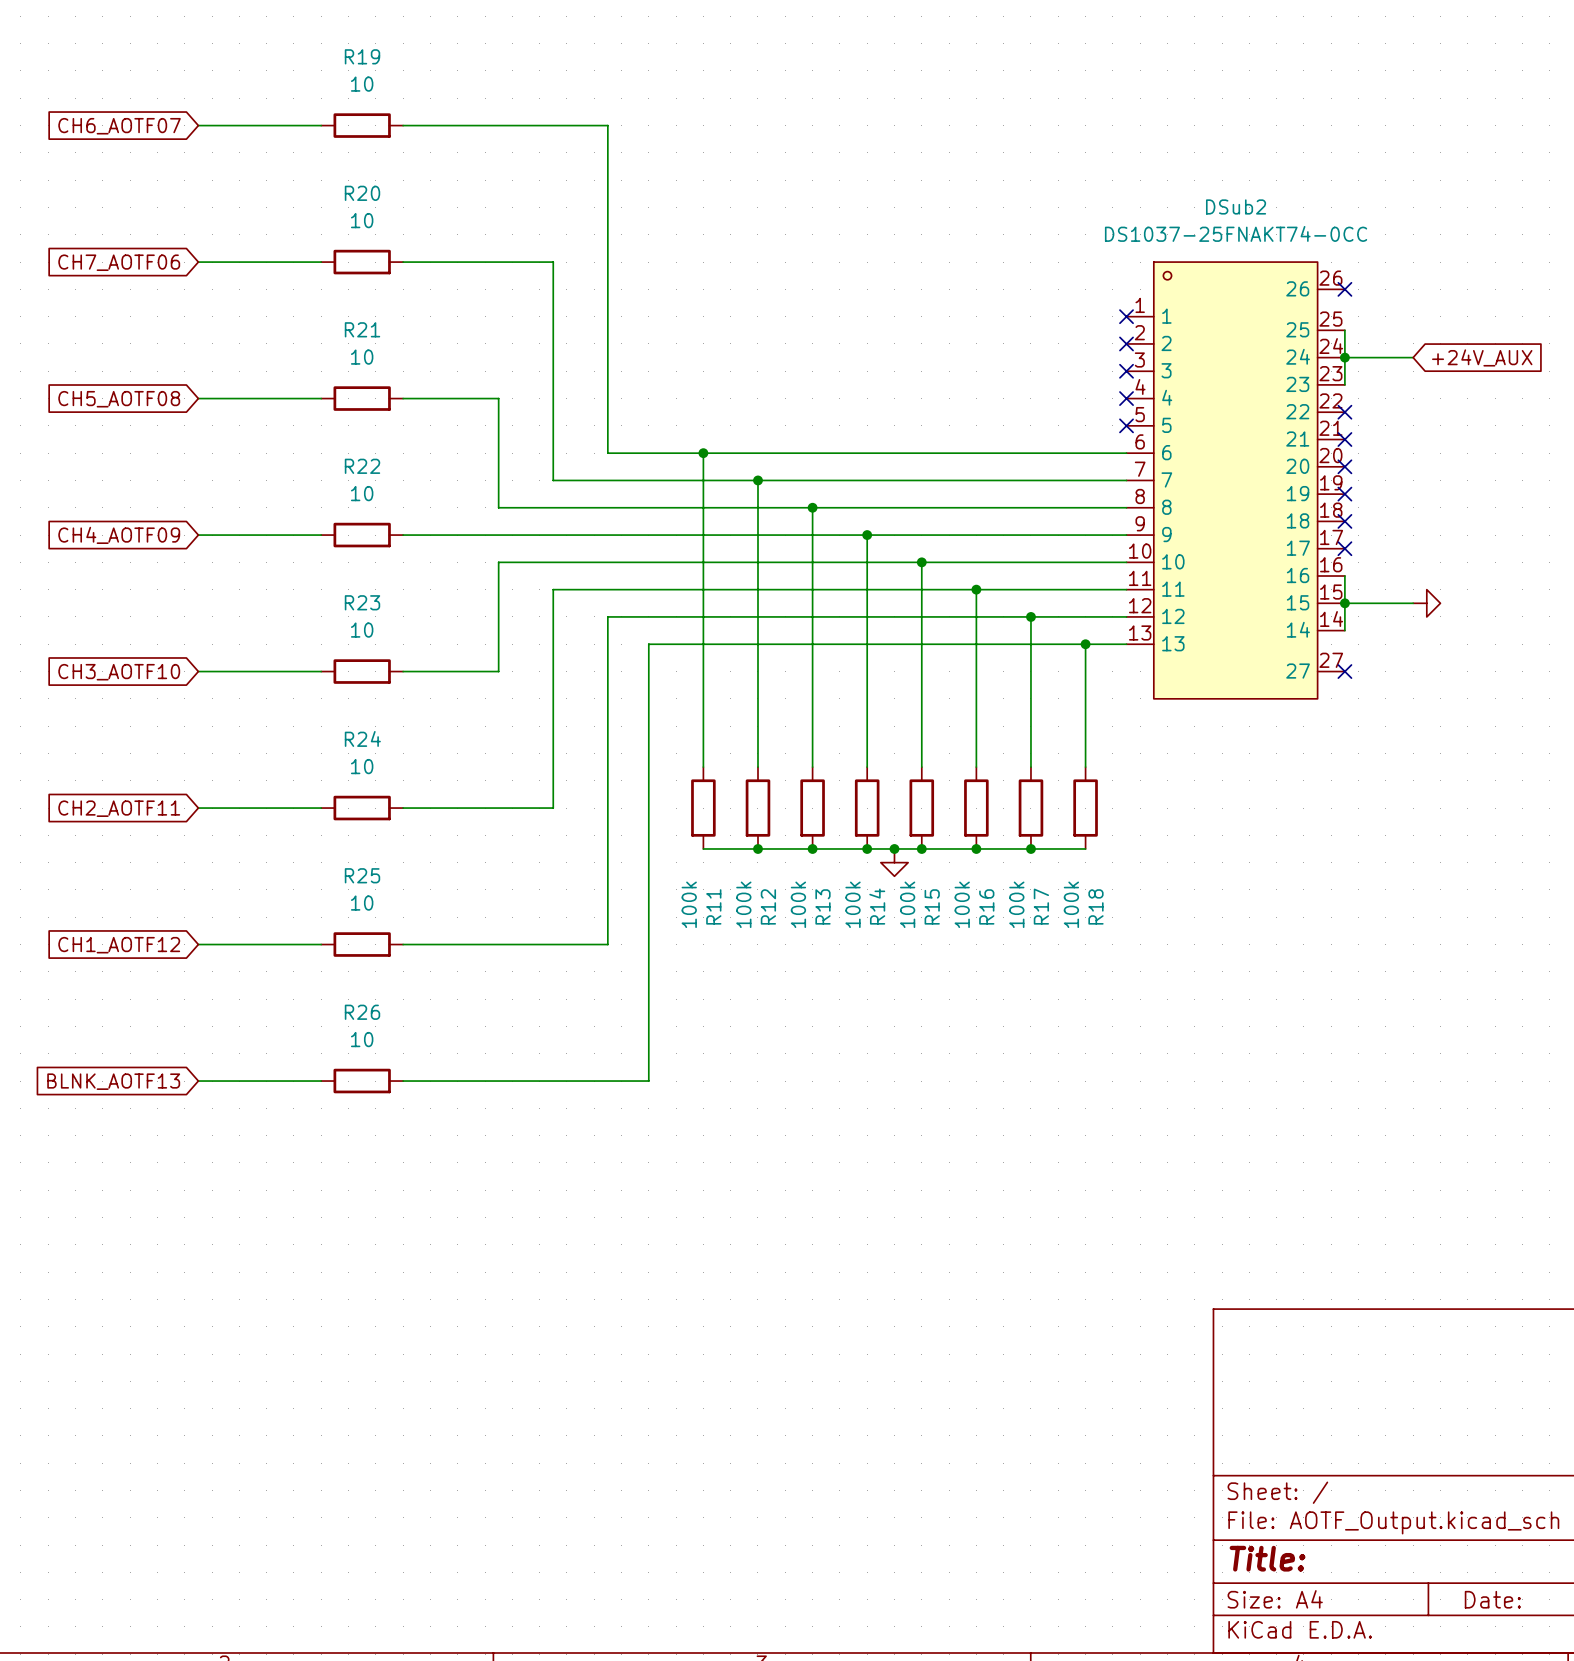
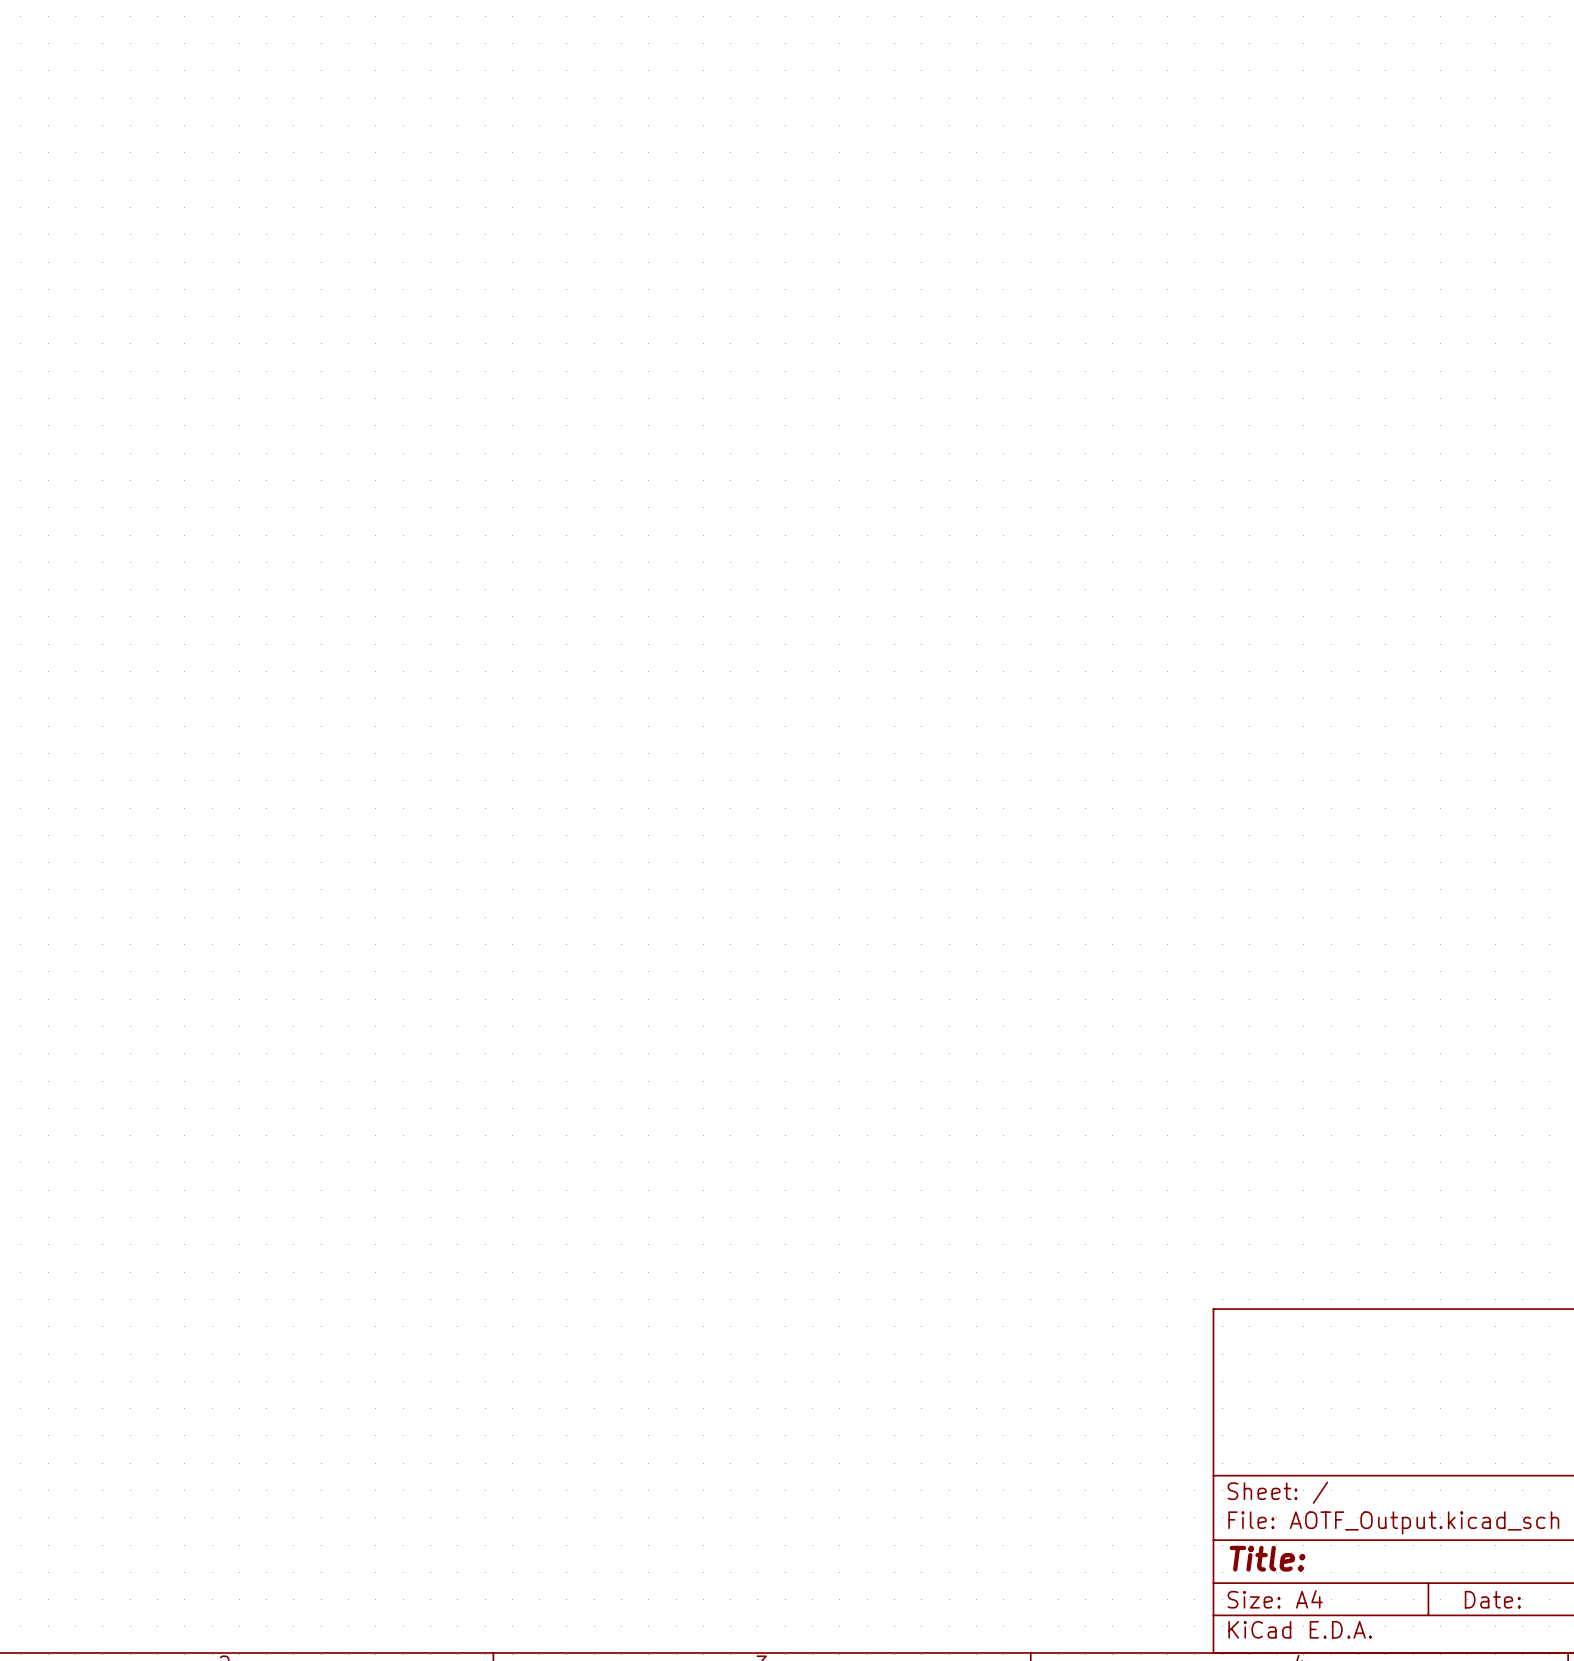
wire: (198, 125) (321, 125) -> none
R19: 10 (362, 125) -> none
wire: (403, 125) (607, 125) (607, 453) (1126, 453) -> none
global label: CH6_AOTF07 (119, 126) -> none
global label: CH7_AOTF06 (119, 262) -> none
wire: (198, 262) (321, 262) -> none
R20: 10 (362, 262) -> none
wire: (403, 262) (553, 262) (553, 480) (1126, 480) -> none
no-connect mark: (1344, 289) -> none
no-connect mark: (1126, 316) -> none
wire: (1344, 330) (1344, 384) -> none
no-connect mark: (1126, 343) -> none
wire: (1344, 357) (1413, 357) -> none
junction: (1344, 357) -> none
global label: +24V_AUX (1482, 357) -> none
no-connect mark: (1126, 371) -> none
wire: (198, 398) (321, 398) -> none
R21: 10 (362, 398) -> none
wire: (403, 398) (498, 398) (498, 507) (1126, 507) -> none
no-connect mark: (1126, 398) -> none
global label: CH5_AOTF08 (119, 399) -> none
no-connect mark: (1344, 412) -> none
no-connect mark: (1126, 425) -> none
no-connect mark: (1344, 439) -> none
wire: (703, 453) (703, 767) -> none
junction: (703, 453) -> none
no-connect mark: (1344, 466) -> none
wire: (757, 480) (757, 767) -> none
junction: (757, 480) -> none
DSub2: DS1037-25FNAKT74-0CC (1235, 480) -> none
no-connect mark: (1344, 494) -> none
wire: (812, 507) (812, 767) -> none
junction: (812, 507) -> none
no-connect mark: (1344, 521) -> none
global label: CH4_AOTF09 (119, 535) -> none
wire: (198, 535) (321, 535) -> none
R22: 10 (362, 535) -> none
wire: (403, 535) (1126, 535) -> none
wire: (867, 535) (867, 767) -> none
junction: (867, 535) -> none
no-connect mark: (1344, 548) -> none
wire: (921, 562) (921, 767) -> none
junction: (921, 562) -> none
wire: (1126, 562) (498, 562) (498, 671) (403, 671) -> none
wire: (1344, 576) (1344, 630) -> none
wire: (976, 589) (976, 767) -> none
junction: (976, 589) -> none
wire: (1126, 589) (553, 589) (553, 808) (403, 808) -> none
wire: (1344, 603) (1413, 603) -> none
junction: (1344, 603) -> none
power symbol: (1426, 603) -> none
wire: (1030, 616) (1030, 767) -> none
junction: (1030, 616) -> none
wire: (1126, 616) (607, 616) (607, 944) (403, 944) -> none
wire: (1085, 644) (1085, 767) -> none
junction: (1085, 644) -> none
wire: (1126, 644) (648, 644) (648, 1081) (403, 1081) -> none
wire: (198, 671) (321, 671) -> none
R23: 10 (362, 671) -> none
no-connect mark: (1344, 671) -> none
global label: CH3_AOTF10 (119, 672) -> none
global label: CH2_AOTF11 (119, 808) -> none
wire: (198, 808) (321, 808) -> none
R24: 10 (362, 808) -> none
R11: 100k (703, 808) -> none
R12: 100k (757, 808) -> none
R13: 100k (812, 808) -> none
R14: 100k (867, 808) -> none
R15: 100k (921, 808) -> none
R16: 100k (976, 808) -> none
R17: 100k (1030, 808) -> none
R18: 100k (1085, 808) -> none
wire: (703, 848) (1085, 848) -> none
junction: (757, 848) -> none
junction: (812, 848) -> none
junction: (867, 848) -> none
junction: (894, 848) -> none
junction: (921, 848) -> none
junction: (976, 848) -> none
junction: (1030, 848) -> none
power symbol: (894, 862) -> none
wire: (198, 944) (321, 944) -> none
R25: 10 (362, 944) -> none
global label: CH1_AOTF12 (119, 945) -> none
global label: BLNK_AOTF13 (113, 1081) -> none
wire: (198, 1081) (321, 1081) -> none
R26: 10 (362, 1081) -> none

